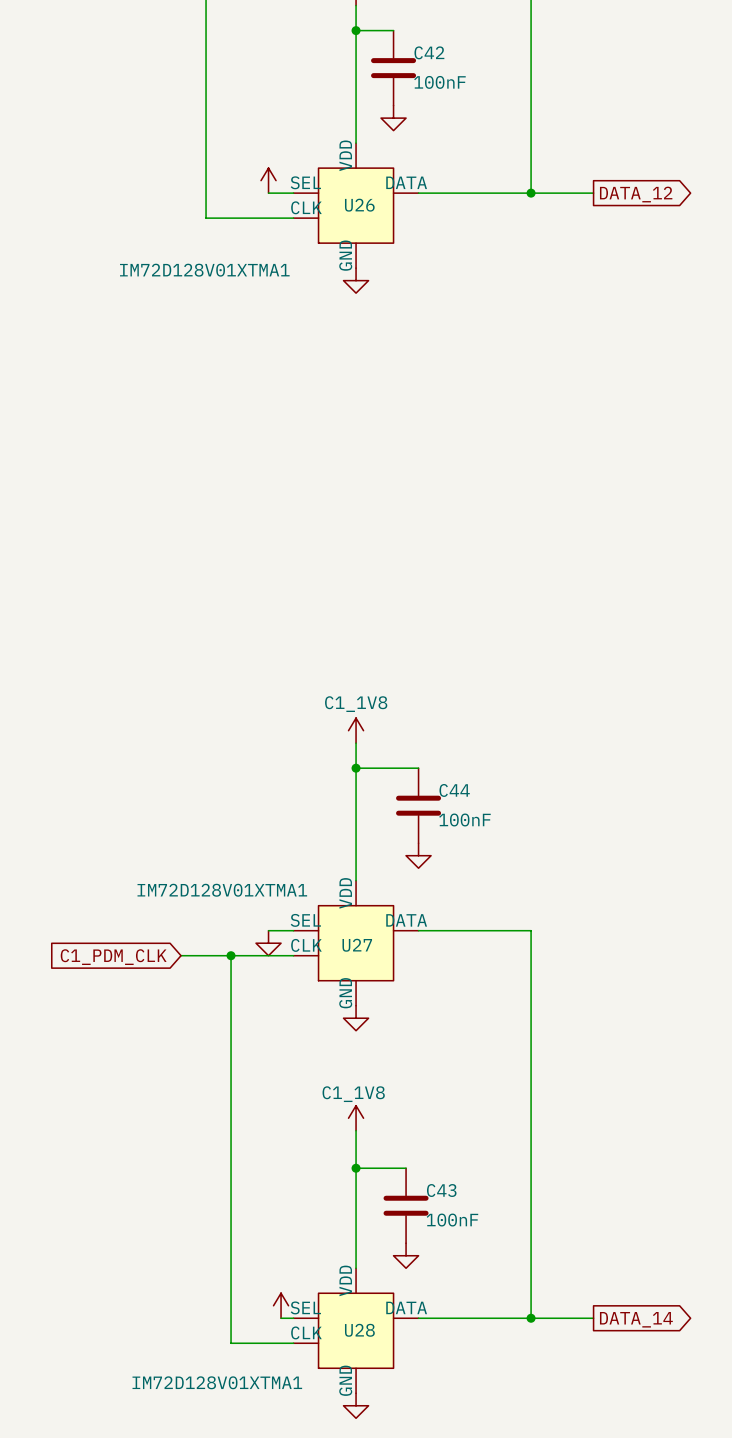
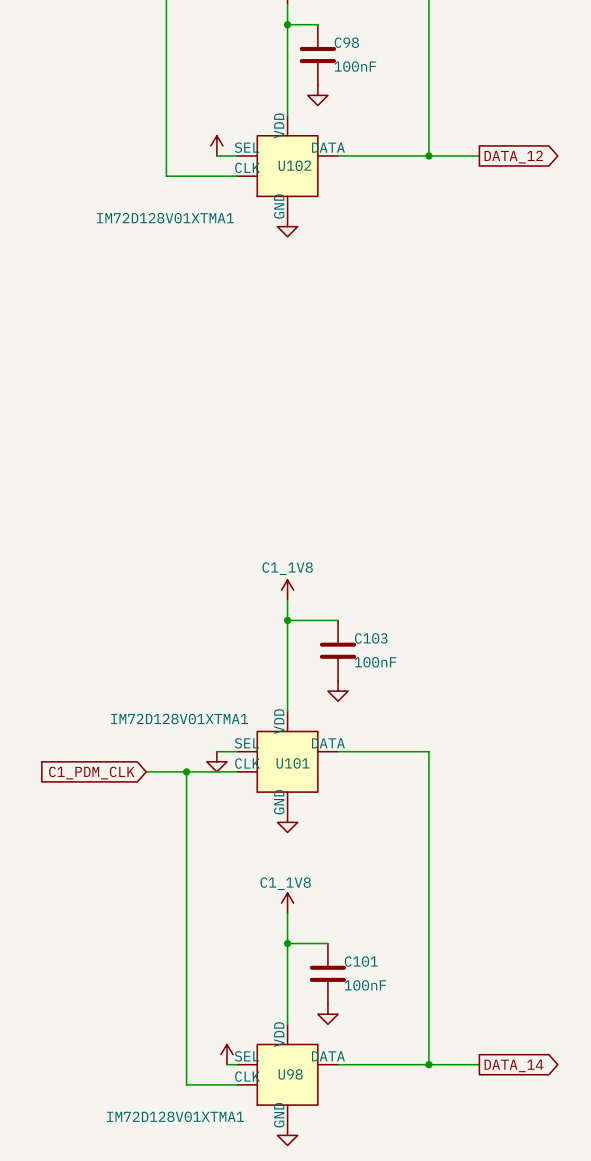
C42 name: C42 (429, 52) -> C98 (346, 42)
U26 name: U26 (359, 205) -> U102 (294, 165)
C44 name: C44 (454, 790) -> C103 (371, 638)
U27 name: U27 (357, 945) -> U101 (293, 763)
C43 name: C43 (441, 1190) -> C101 (361, 961)
U28 name: U28 (359, 1330) -> U98 (290, 1074)

